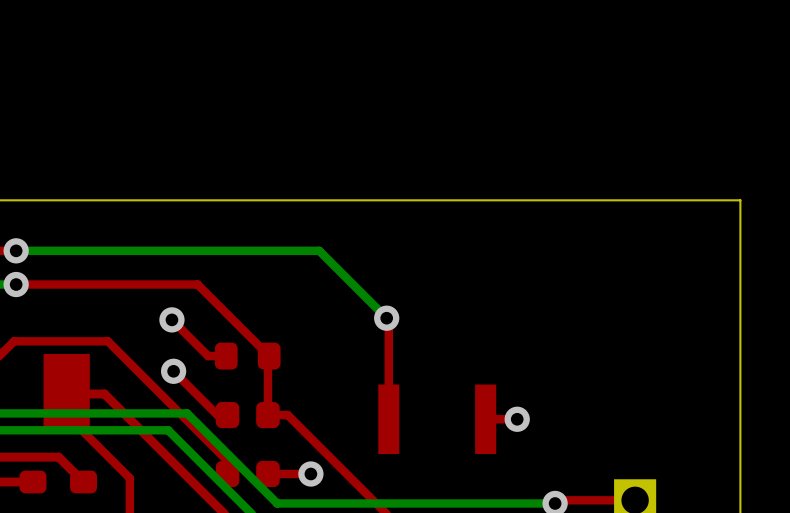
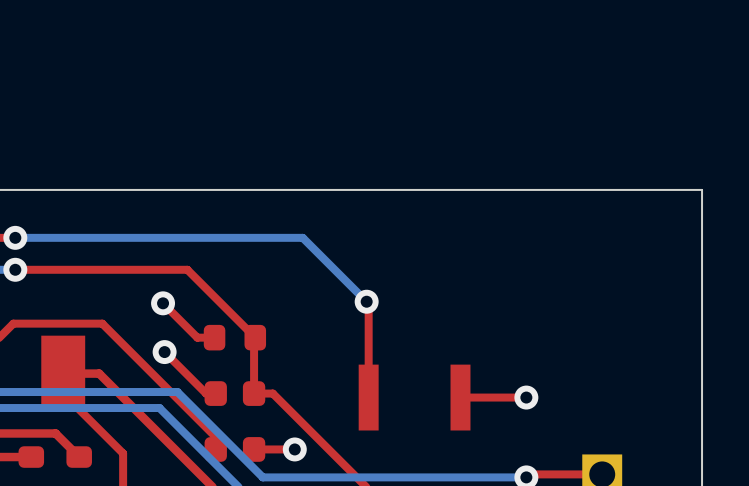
via position: (517, 419) -> (526, 397)
top track: none -> (526, 397) (490, 397)

